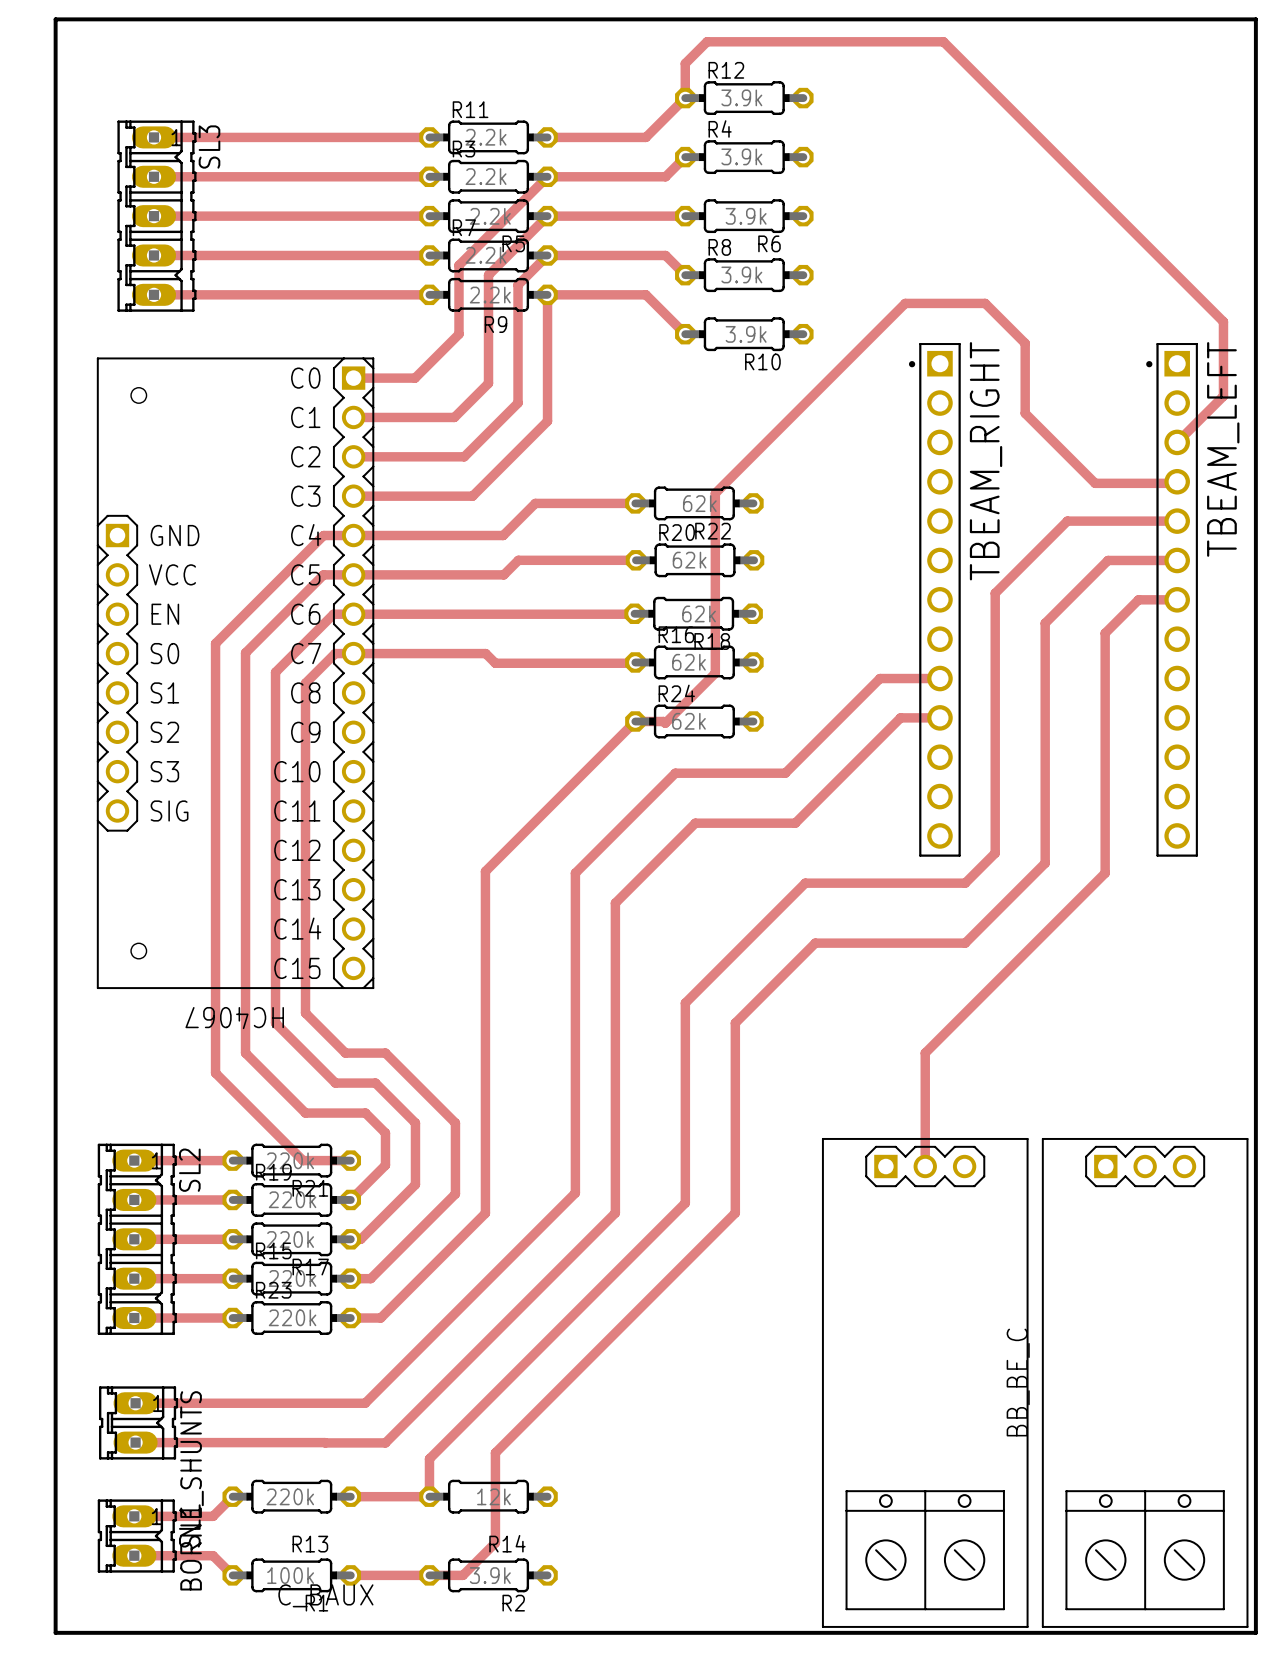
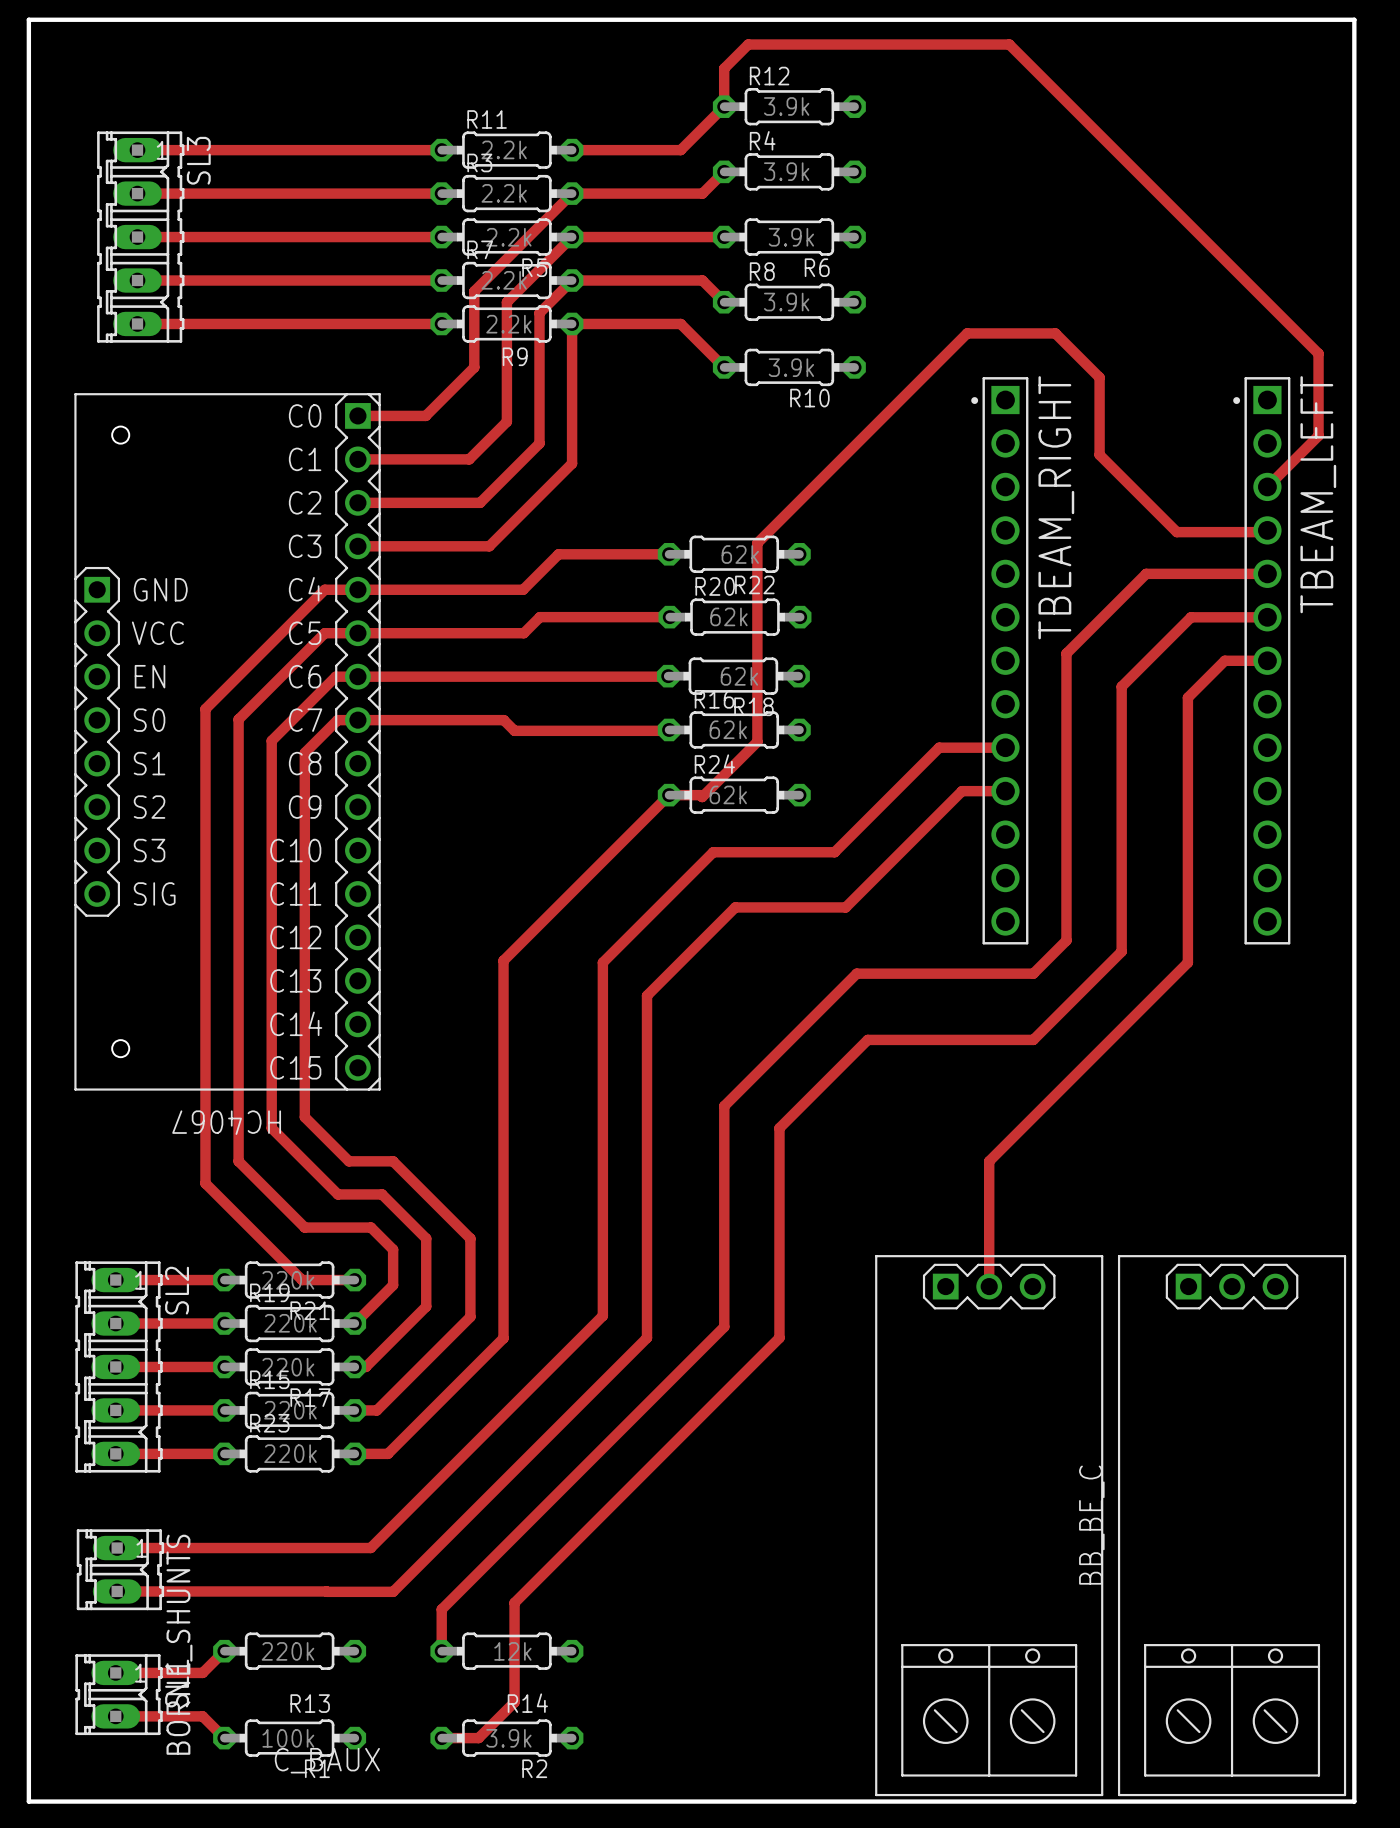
top track: (350, 1496) (429, 1496) -> none
top track: (350, 1575) (429, 1575) -> none

